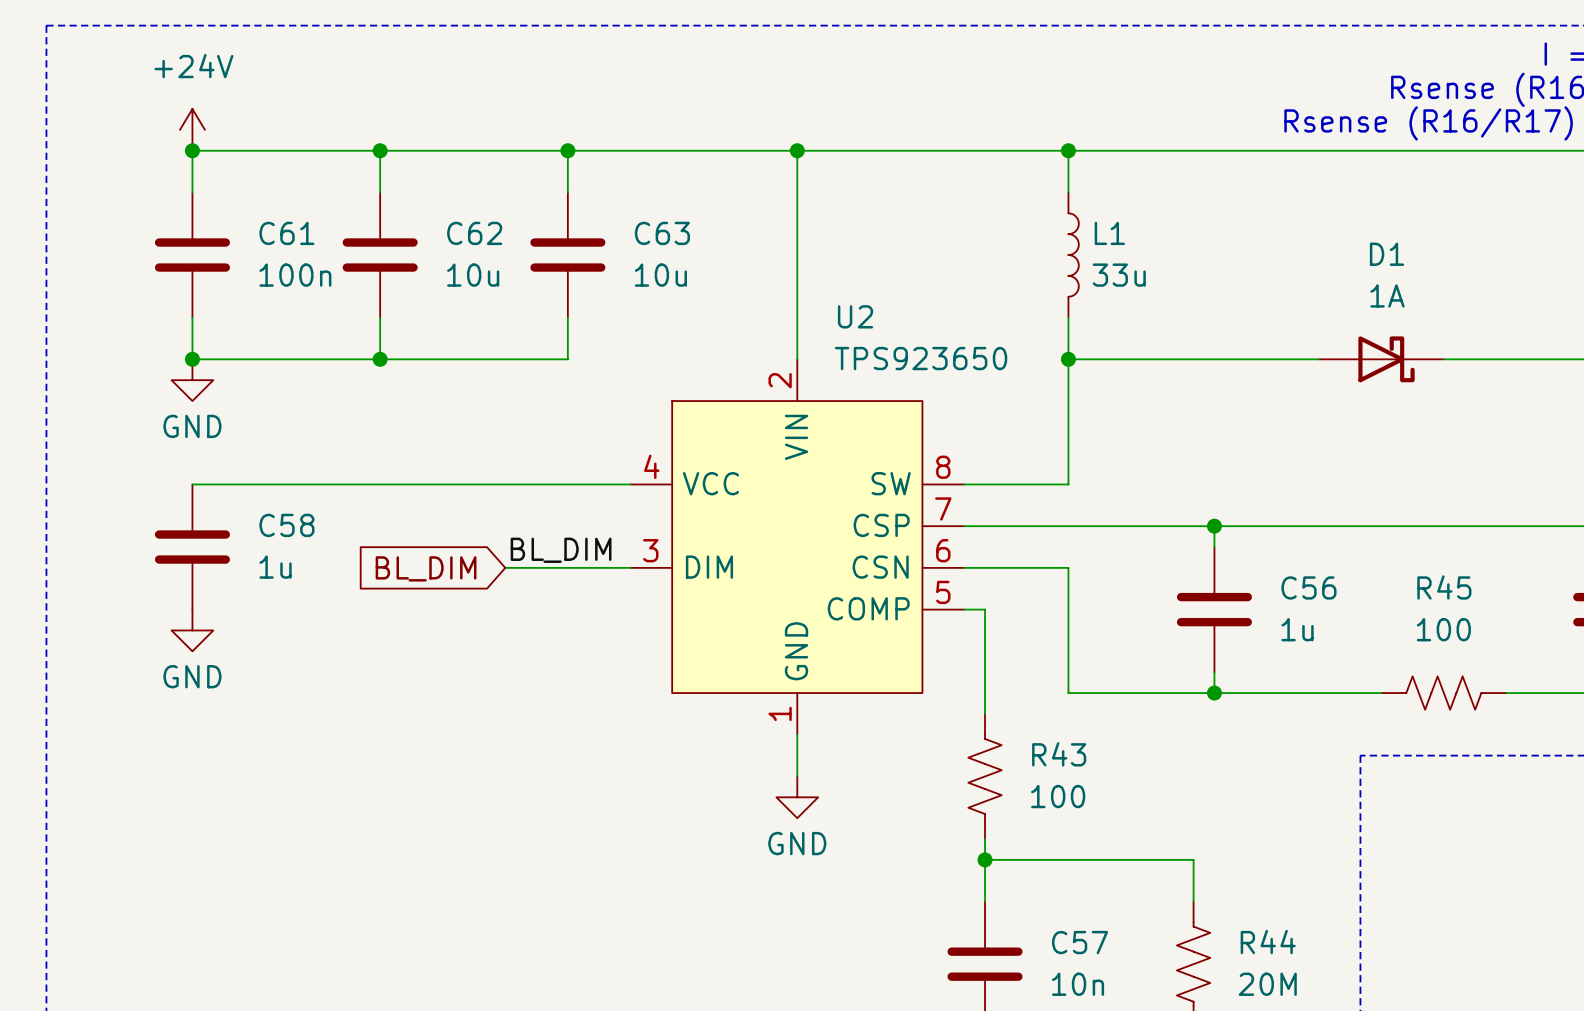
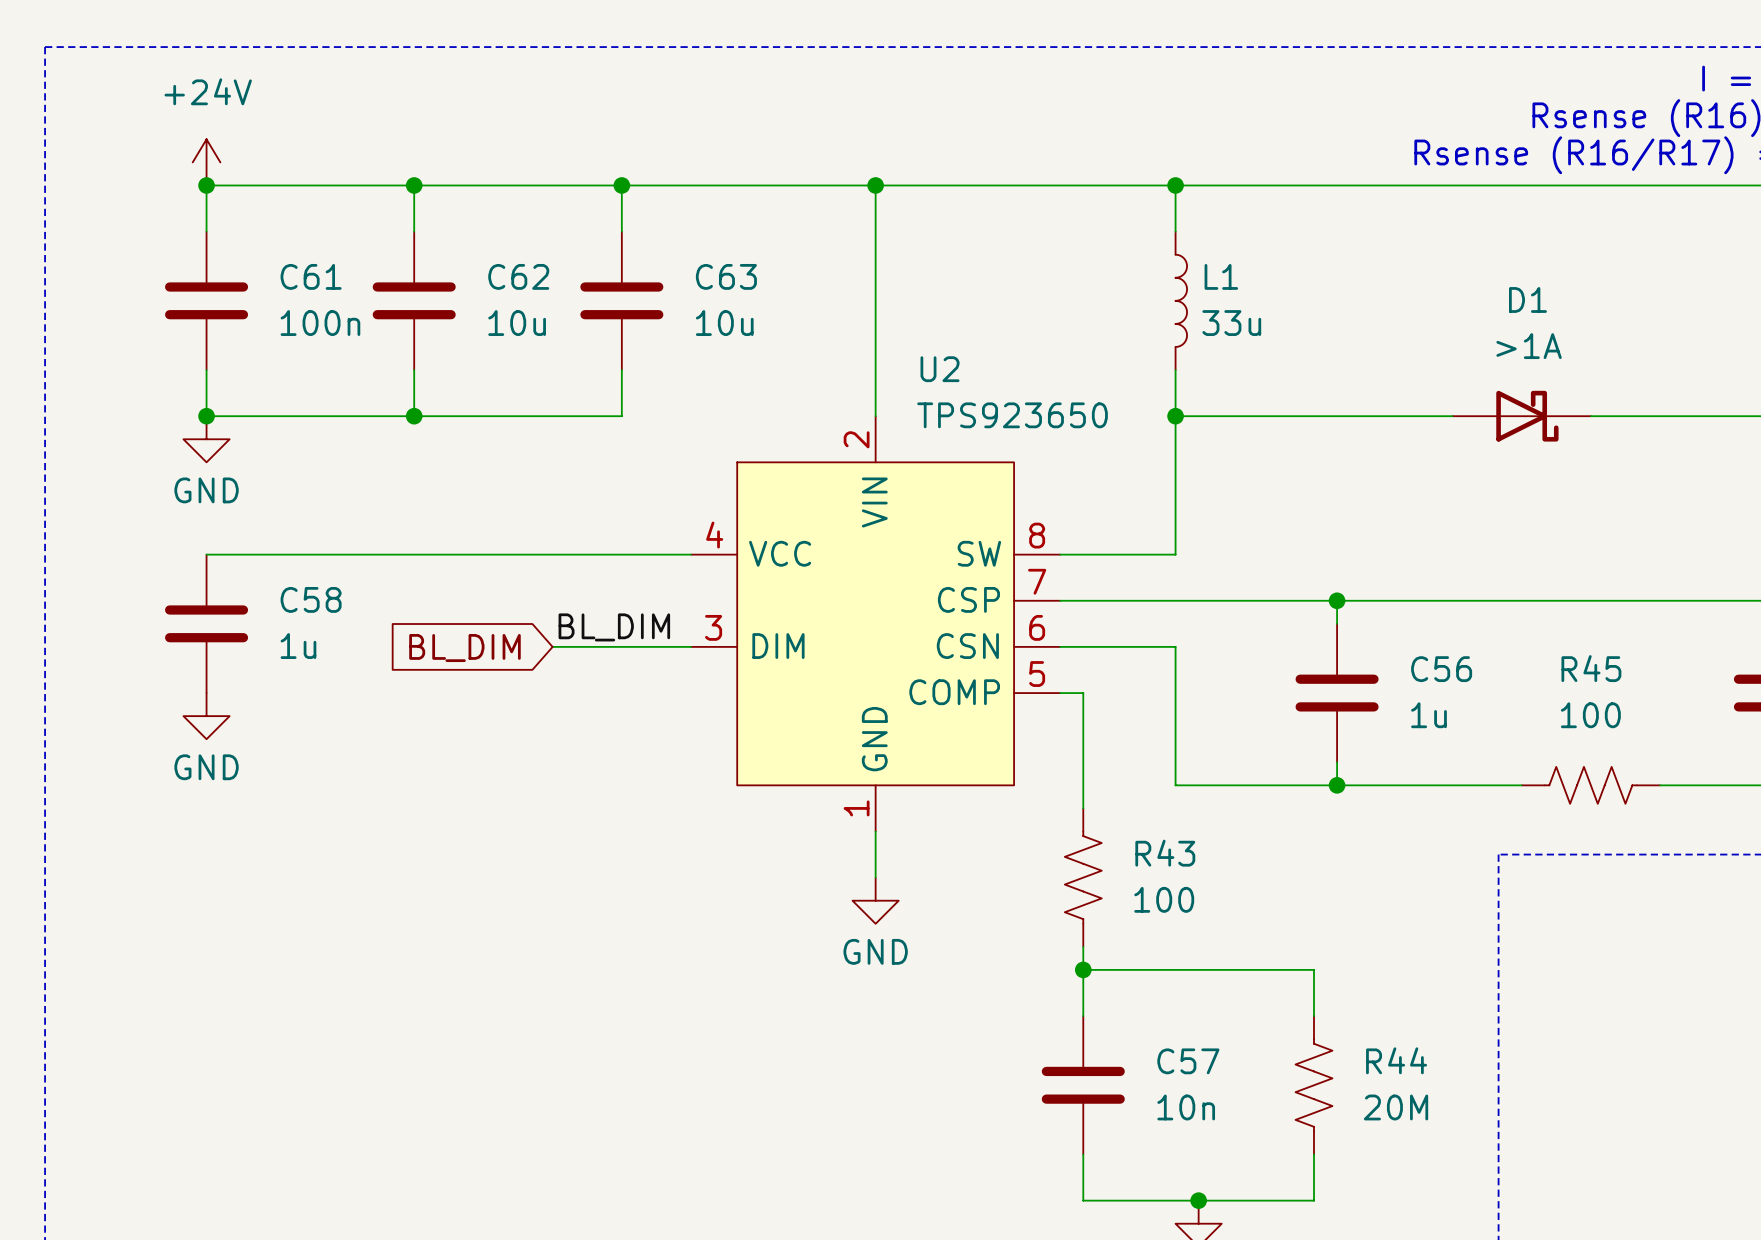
D1 value: 1A (1387, 295) -> >1A (1529, 346)

